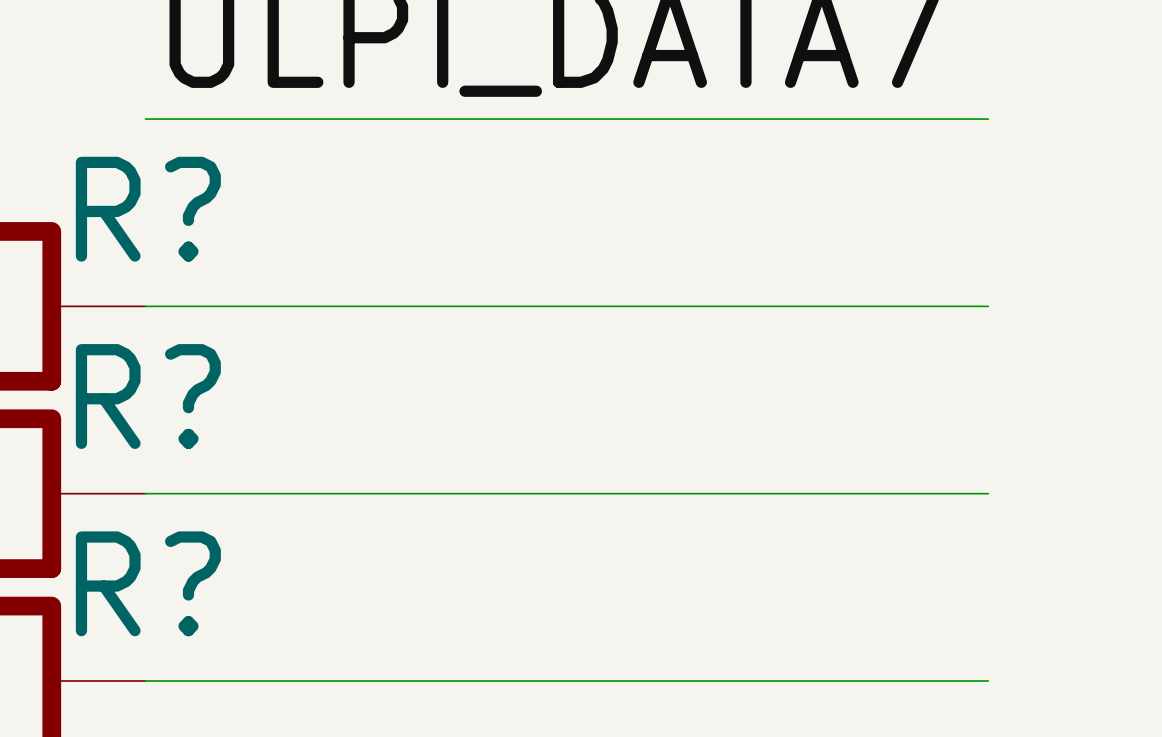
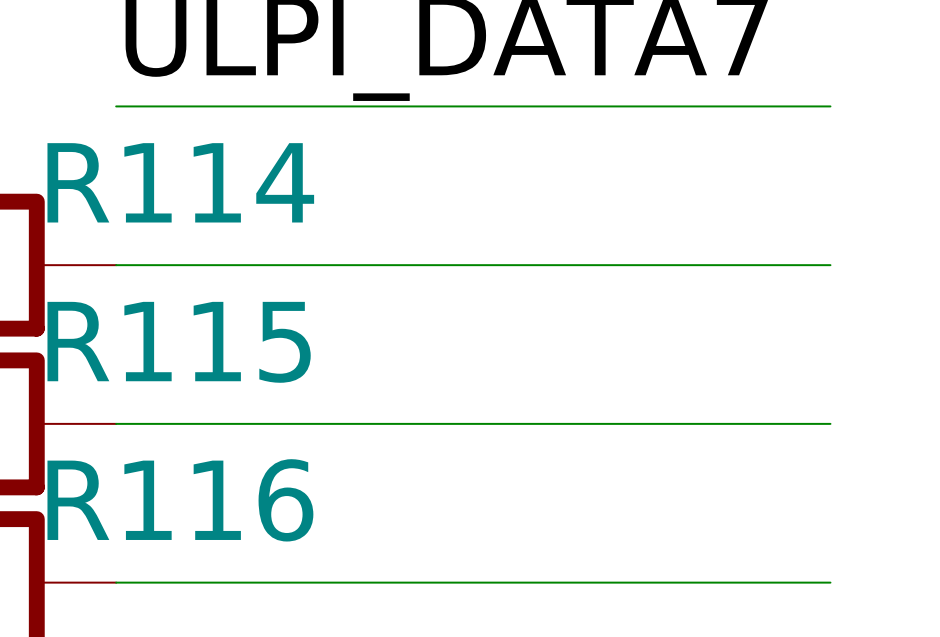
R? name: R? (148, 209) -> R114 (180, 182)
R? name: R? (148, 396) -> R115 (179, 342)
R? name: R? (148, 583) -> R116 (180, 500)

